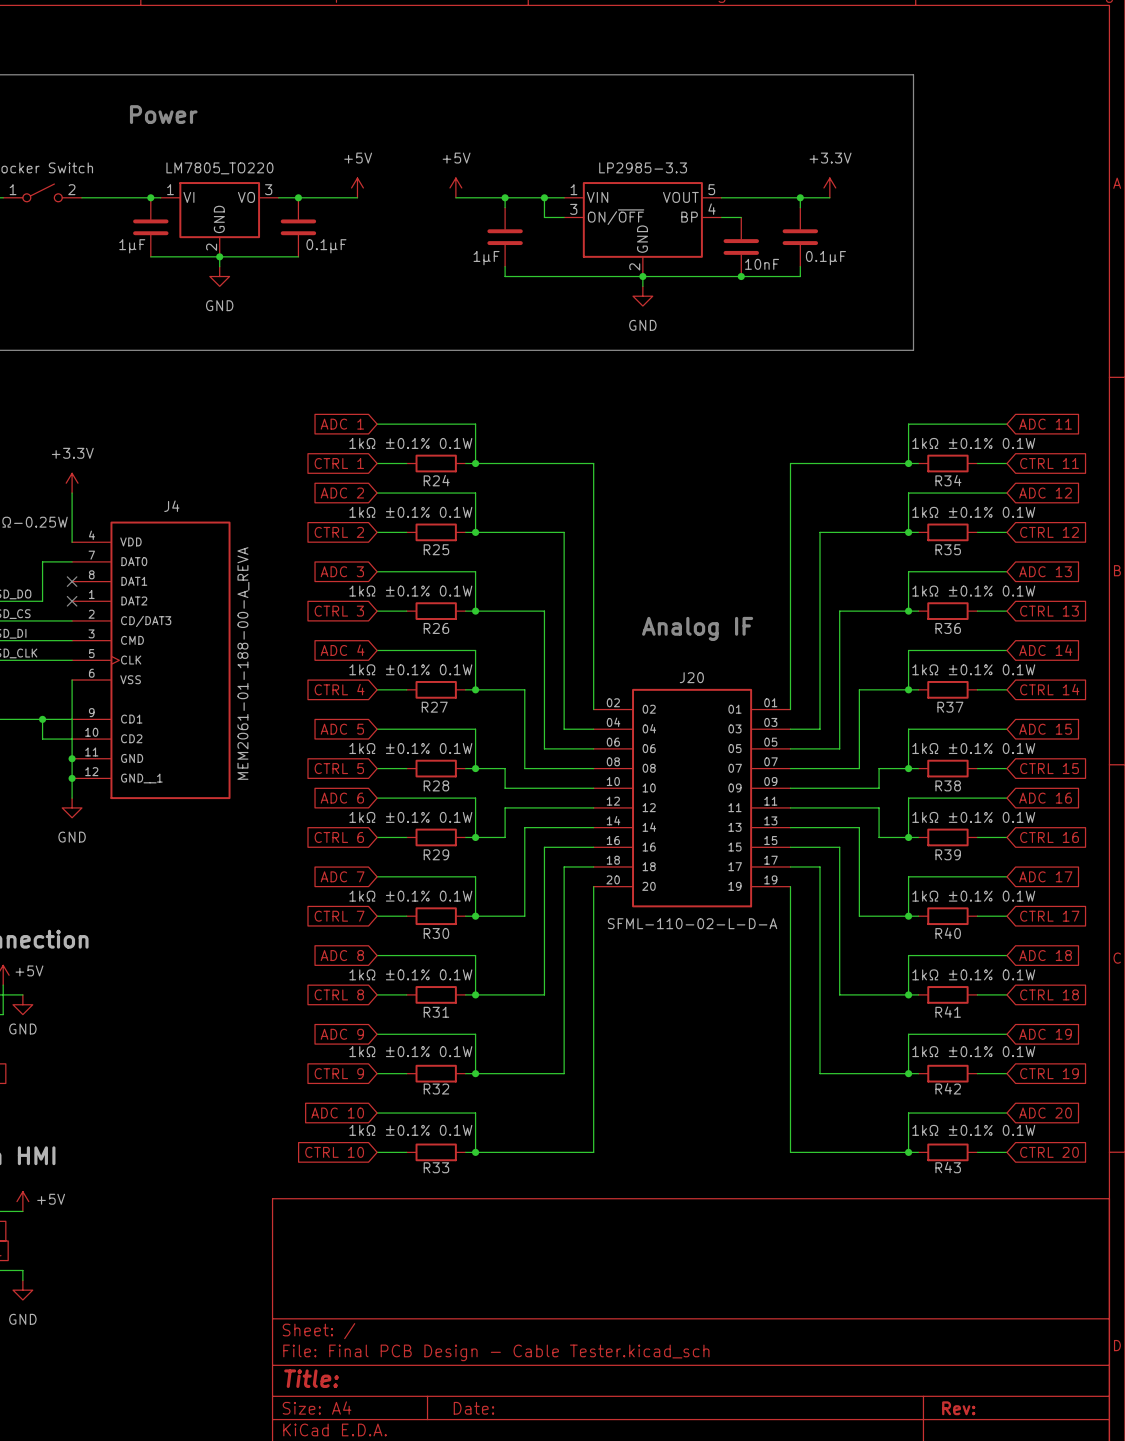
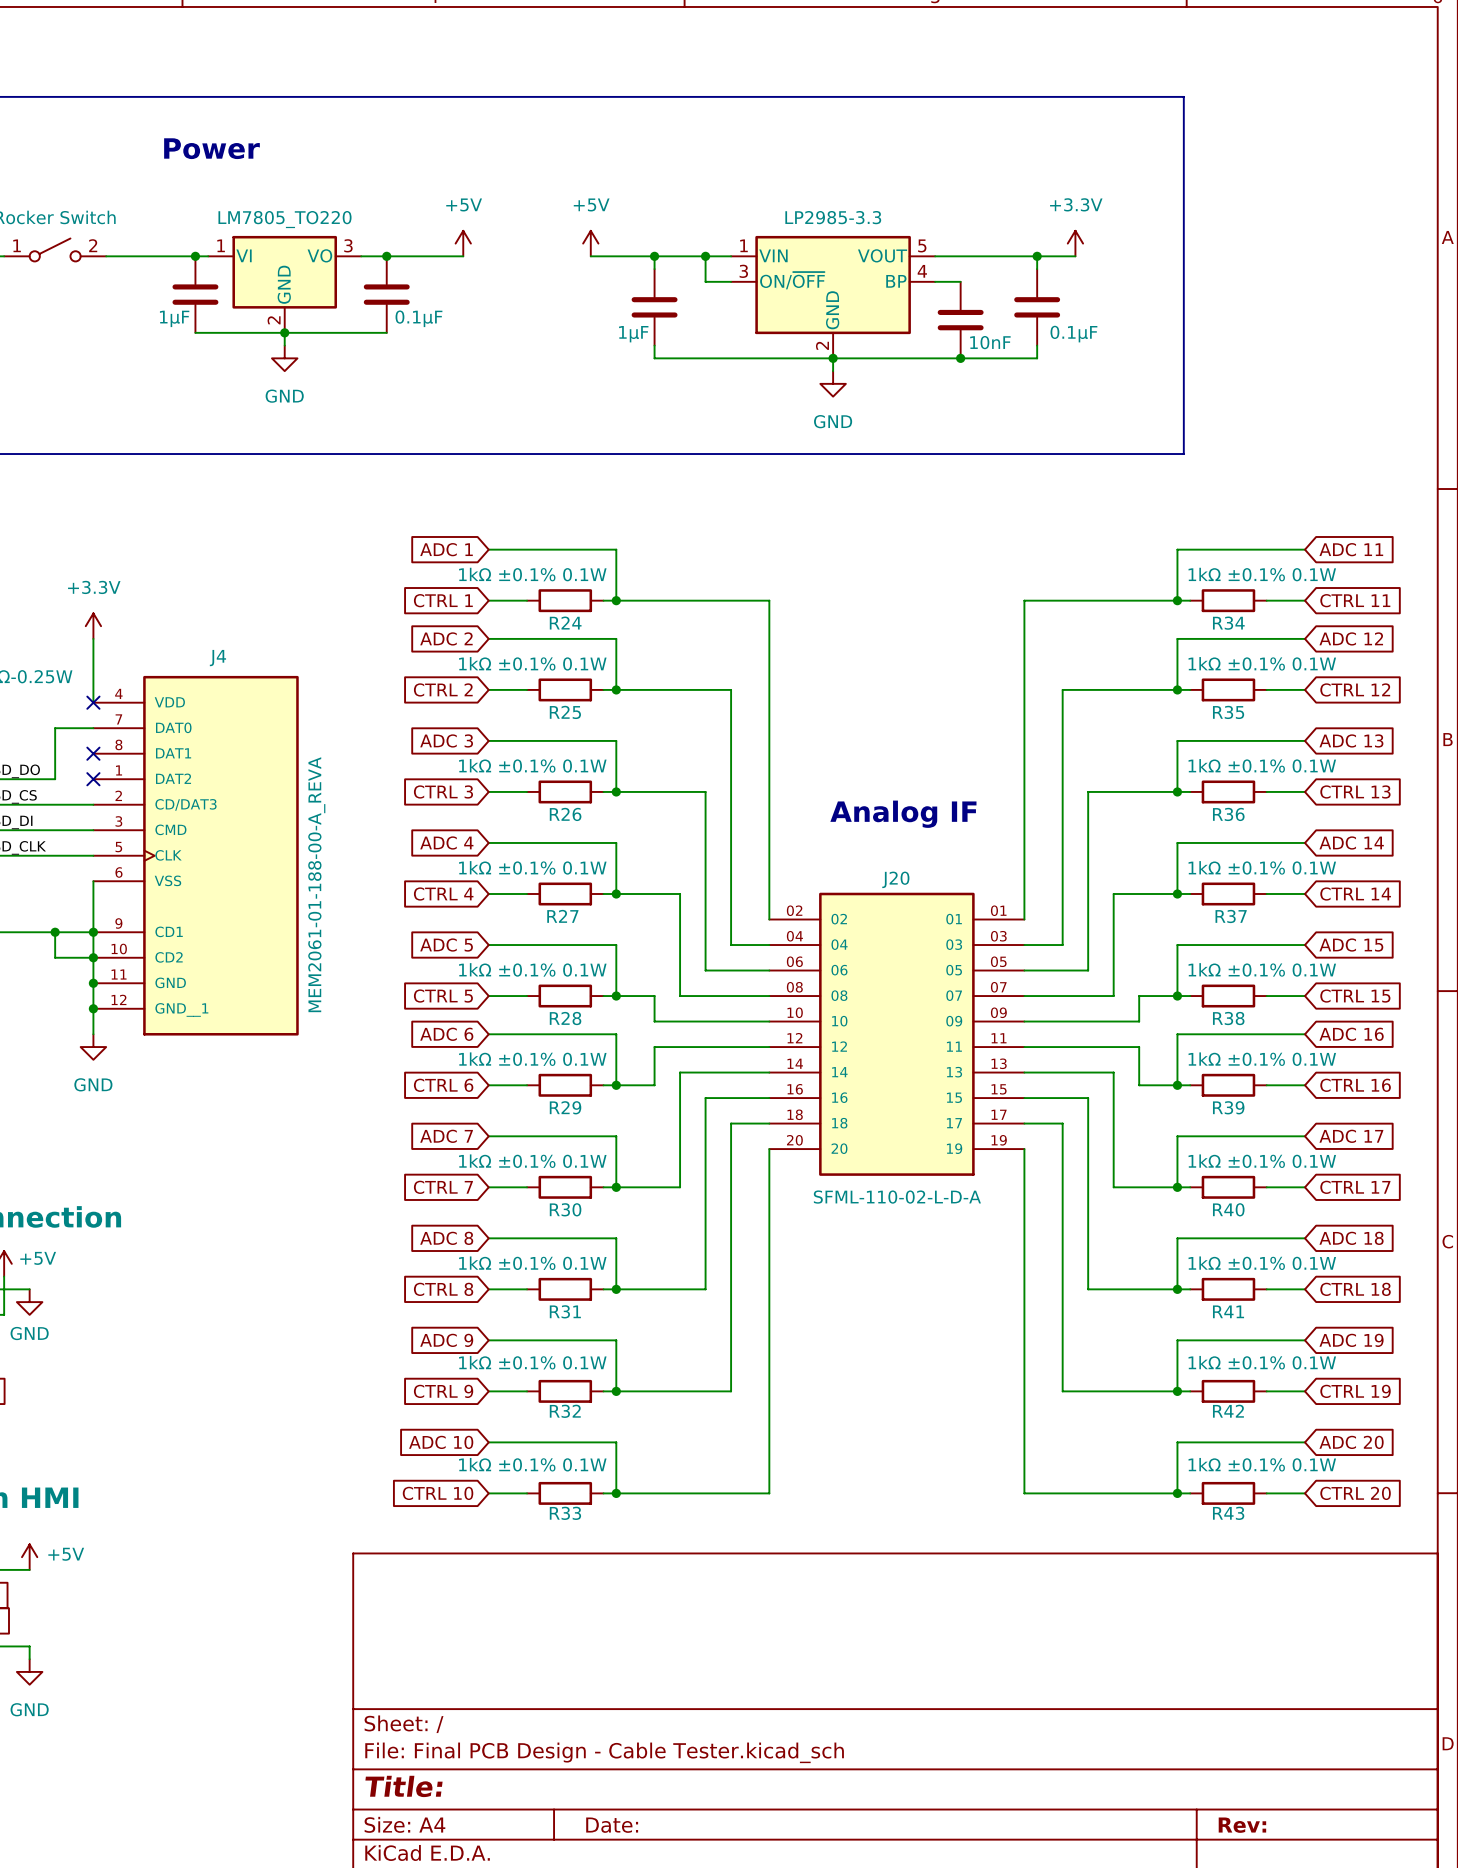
no-connect mark: none -> (93, 702)
junction: none -> (93, 932)
junction: none -> (93, 957)

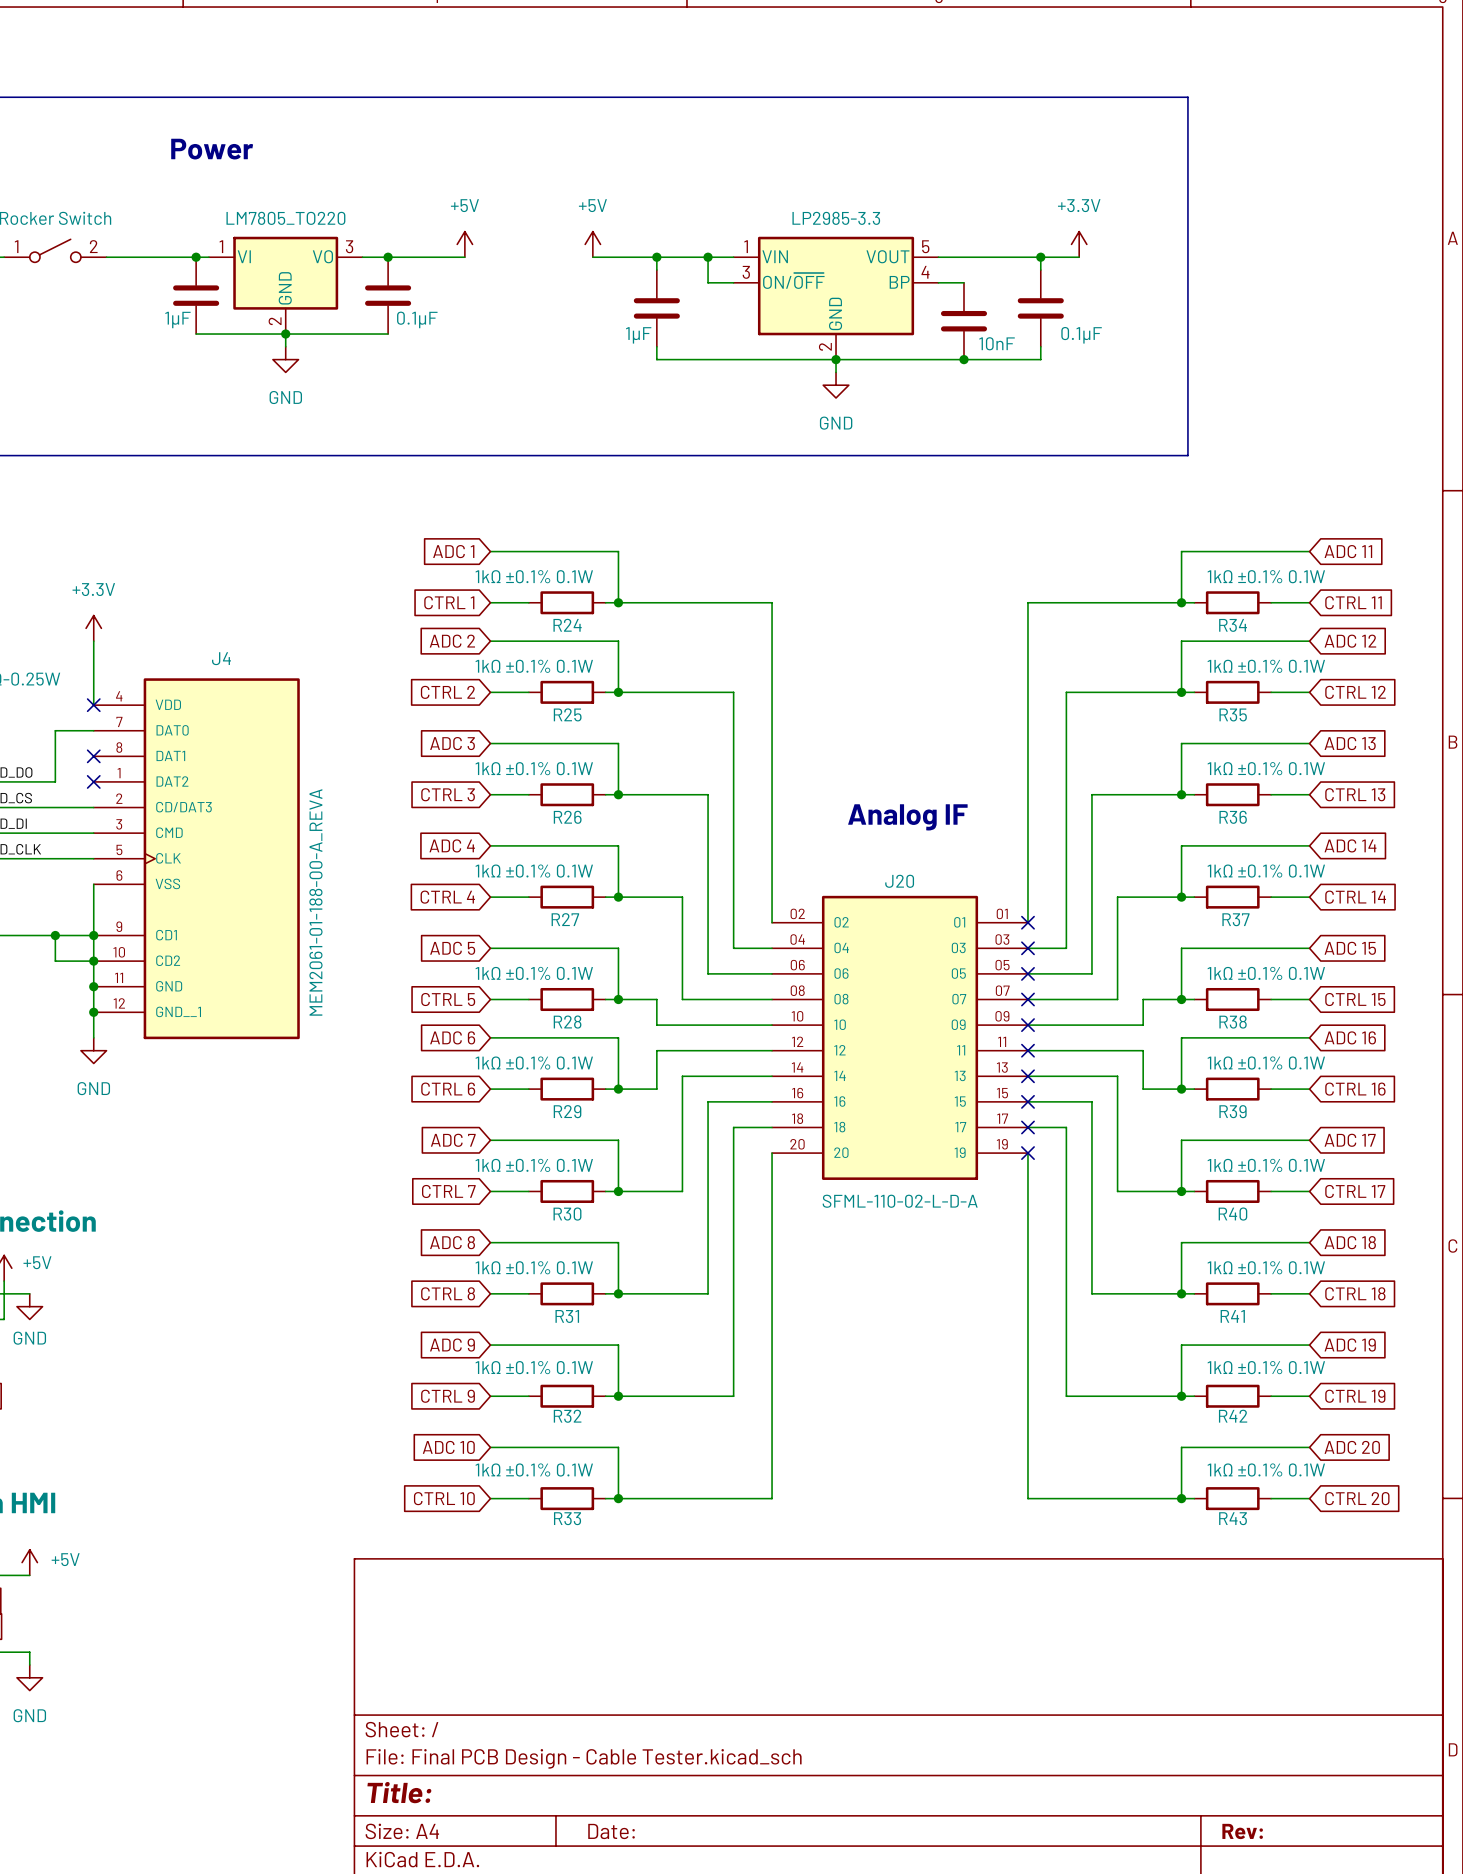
no-connect mark: none -> (1027, 922)
no-connect mark: none -> (1027, 948)
no-connect mark: none -> (1027, 973)
no-connect mark: none -> (1027, 999)
no-connect mark: none -> (1027, 1025)
no-connect mark: none -> (1027, 1050)
no-connect mark: none -> (1027, 1076)
no-connect mark: none -> (1027, 1101)
no-connect mark: none -> (1027, 1127)
no-connect mark: none -> (1027, 1153)

